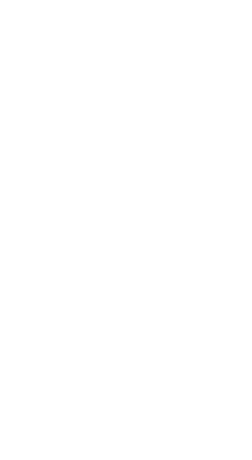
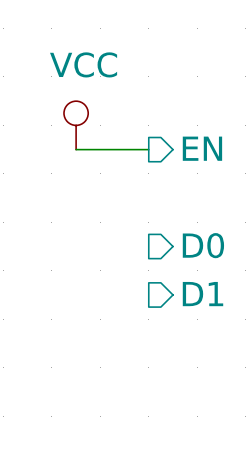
power symbol: none -> VCC (76, 125)
sheet pin: none -> EN (202, 148)
wire: none -> (76, 149) (148, 149)
sheet pin: none -> D0 (203, 245)
sheet pin: none -> D1 (202, 294)

